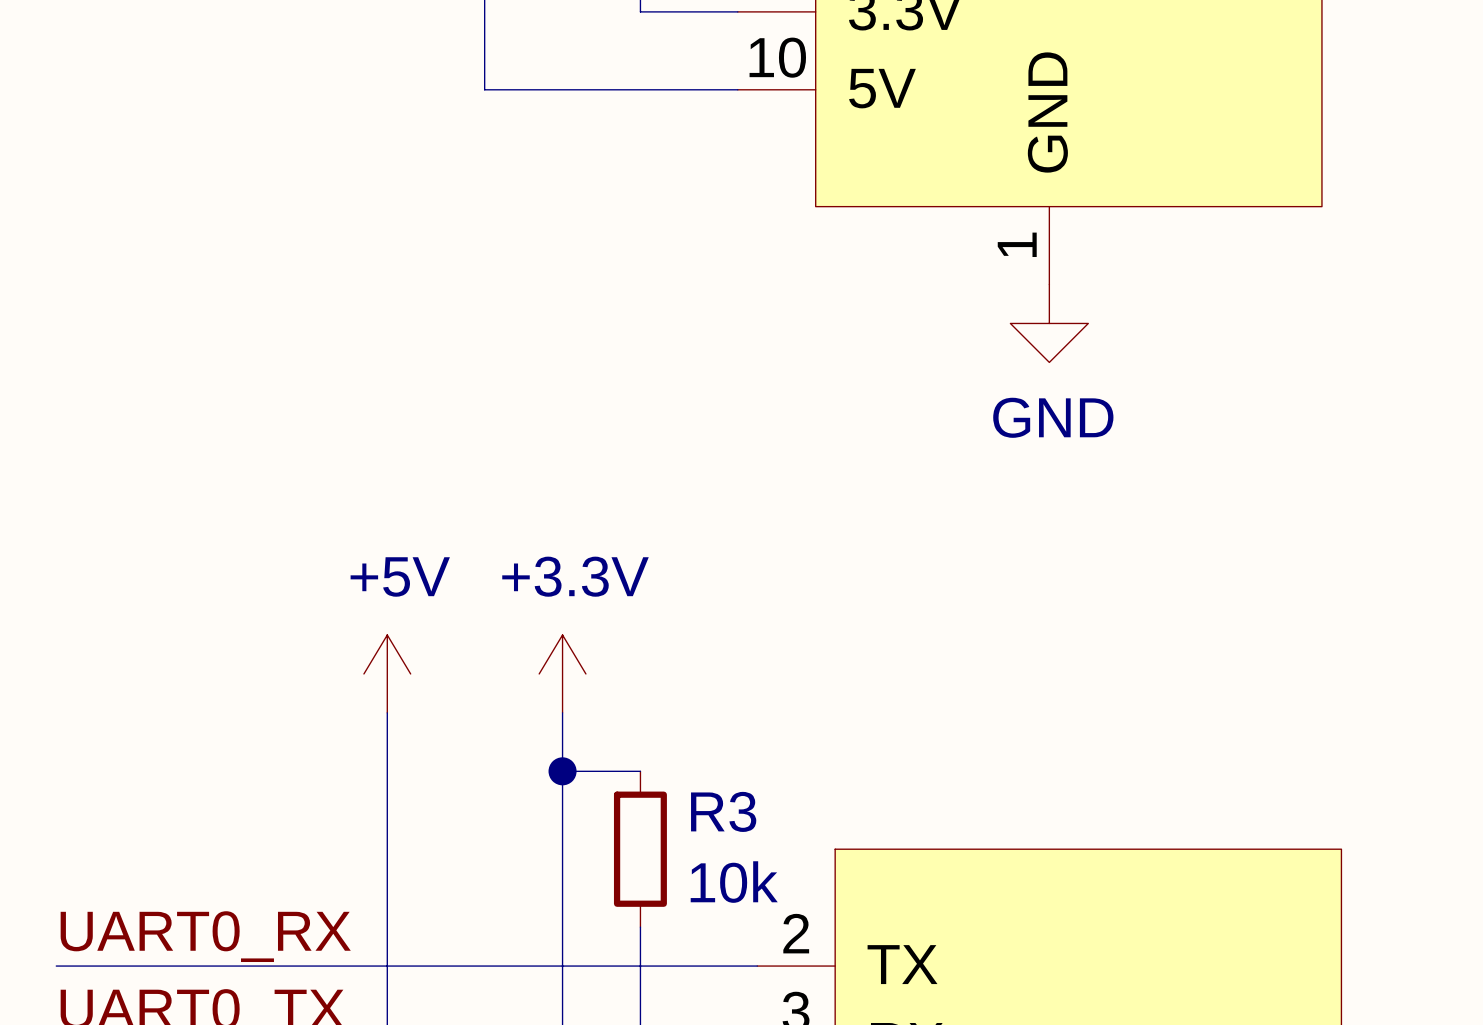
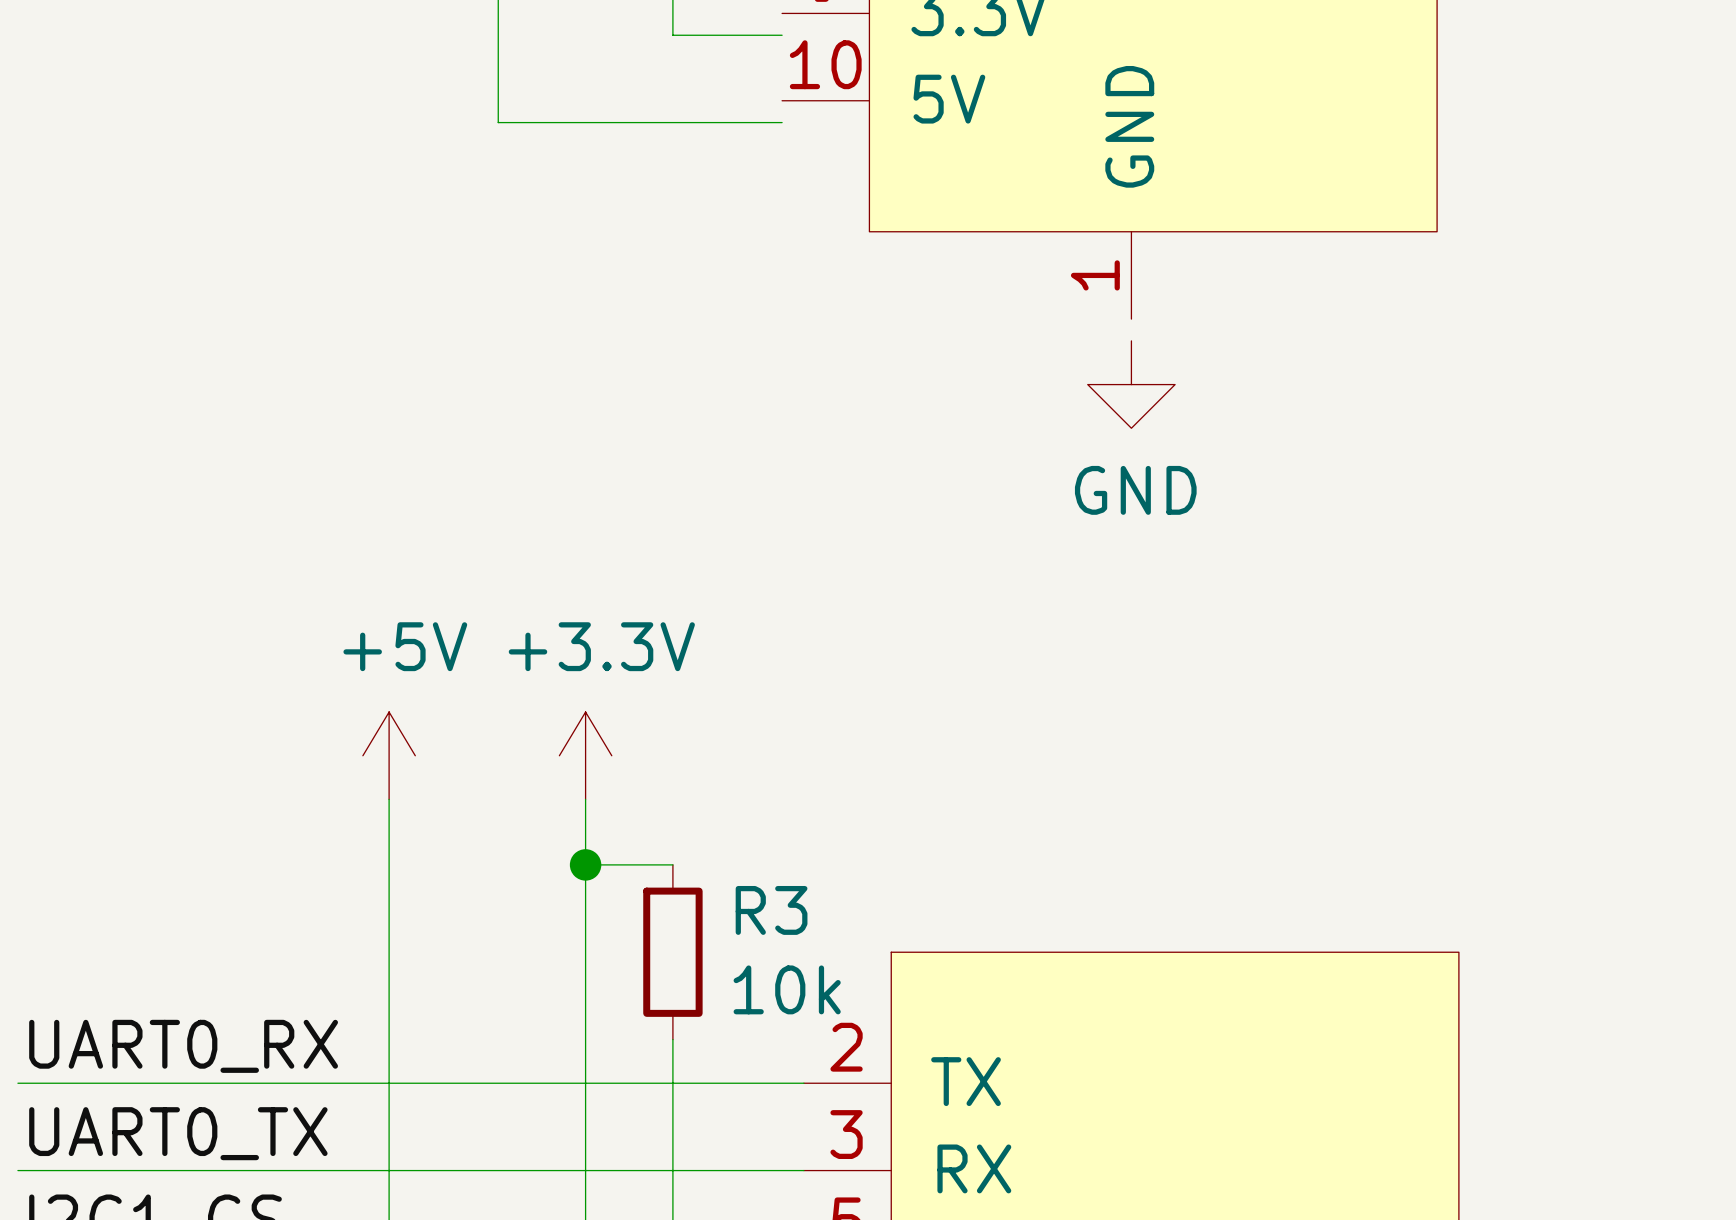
wire: (640, 11) (737, 11) -> (672, 13) (672, 35) (782, 35)
wire: (484, 89) (737, 89) -> (498, 100) (498, 122) (782, 122)
power symbol position: GND (1049, 323) -> GND (1131, 384)

